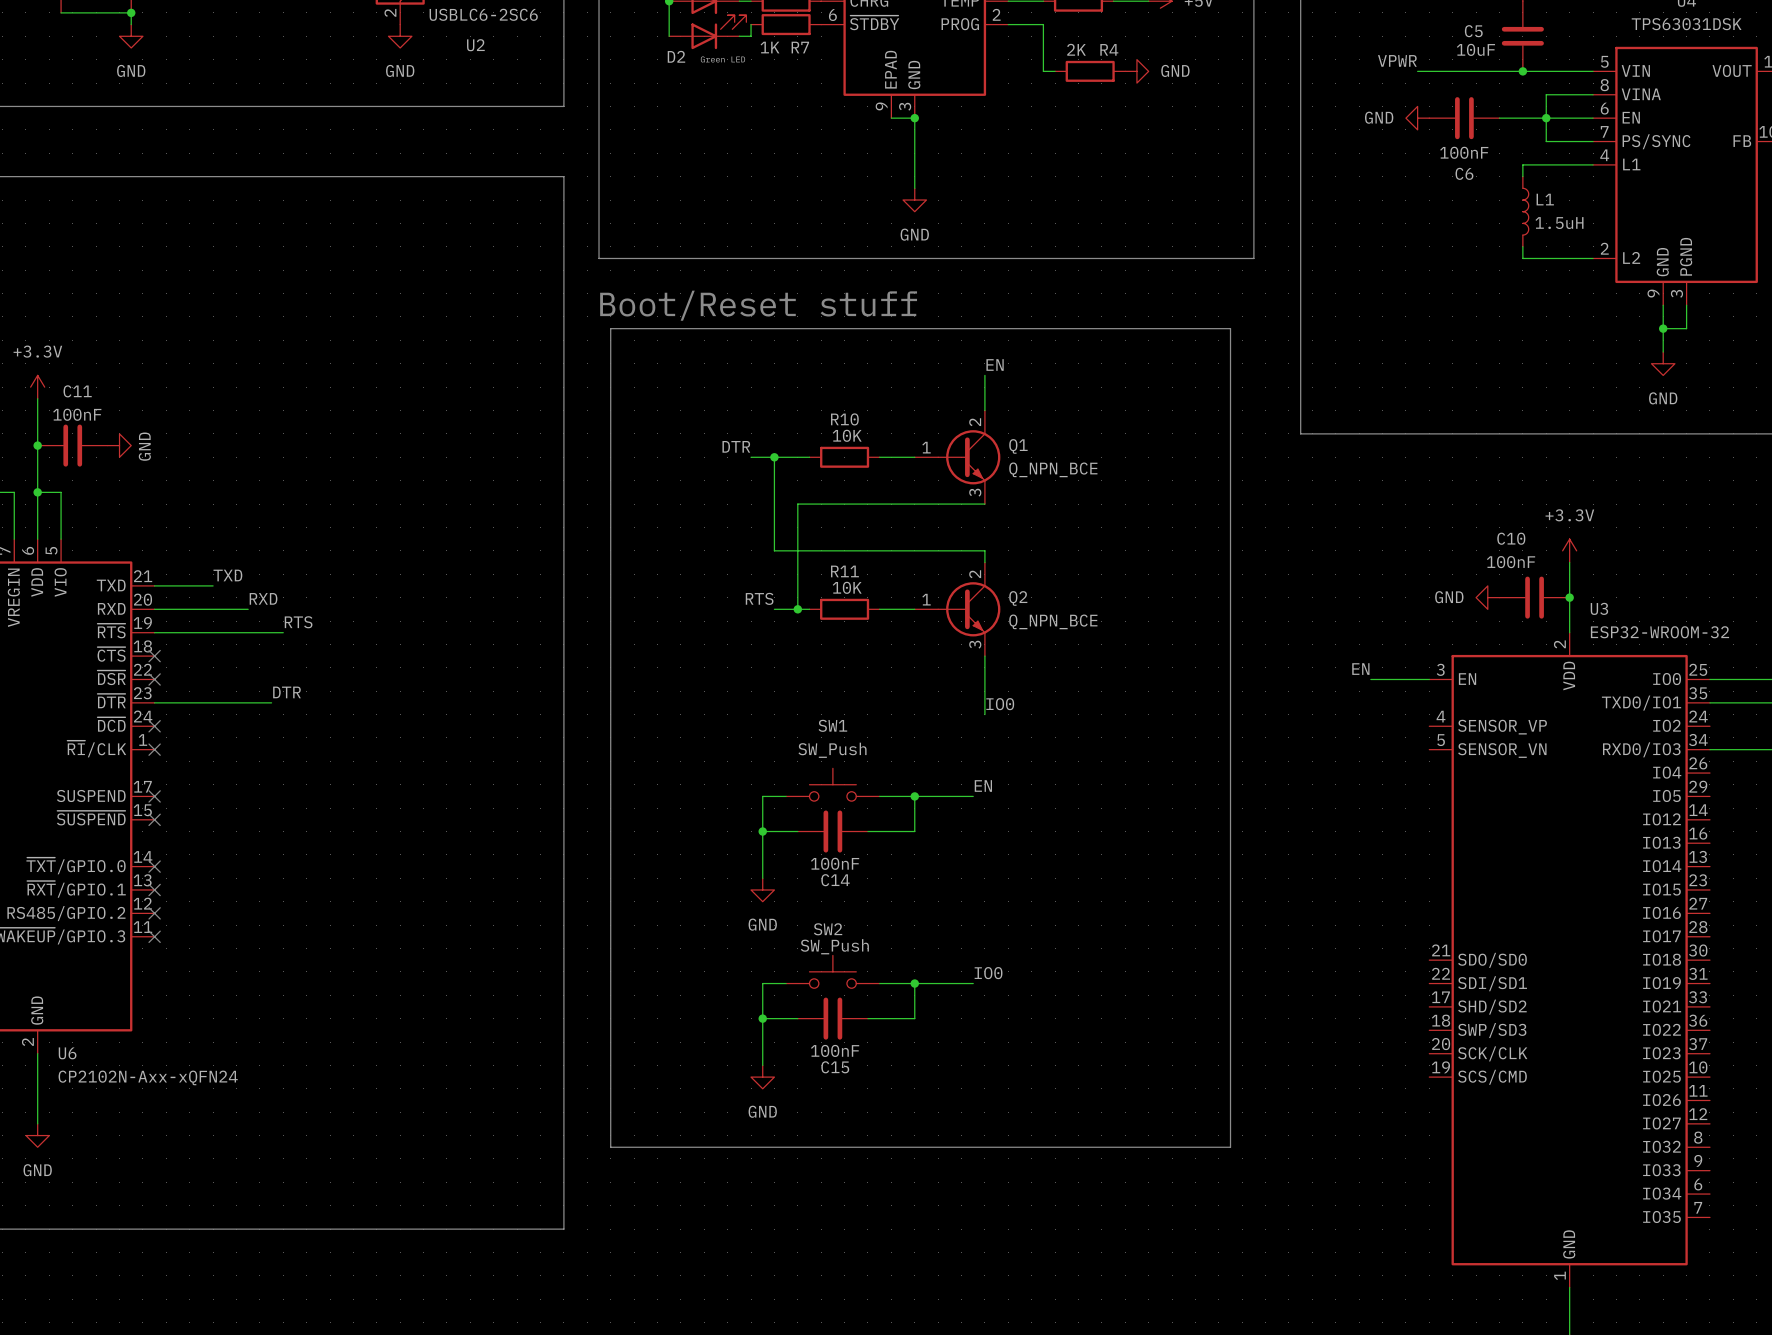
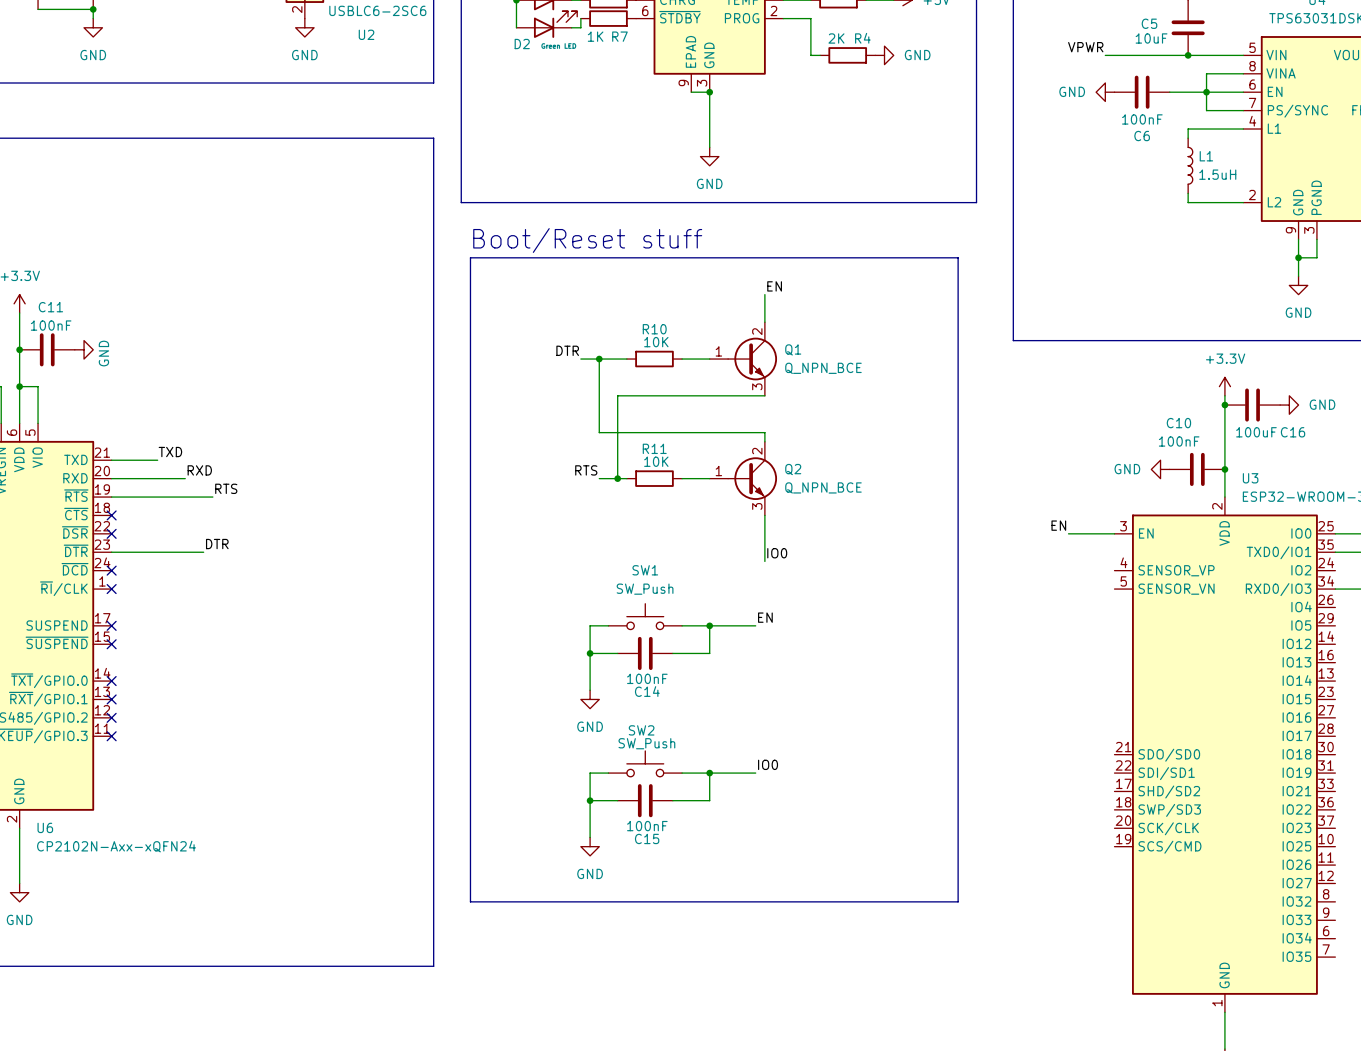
wire: none -> (1224, 395) (1224, 441)
junction: none -> (1224, 405)
C16: none -> 100uF (1252, 405)
power symbol: none -> GND (1289, 405)
power symbol position: +3.3V (1569, 550) -> +3.3V (1224, 386)

